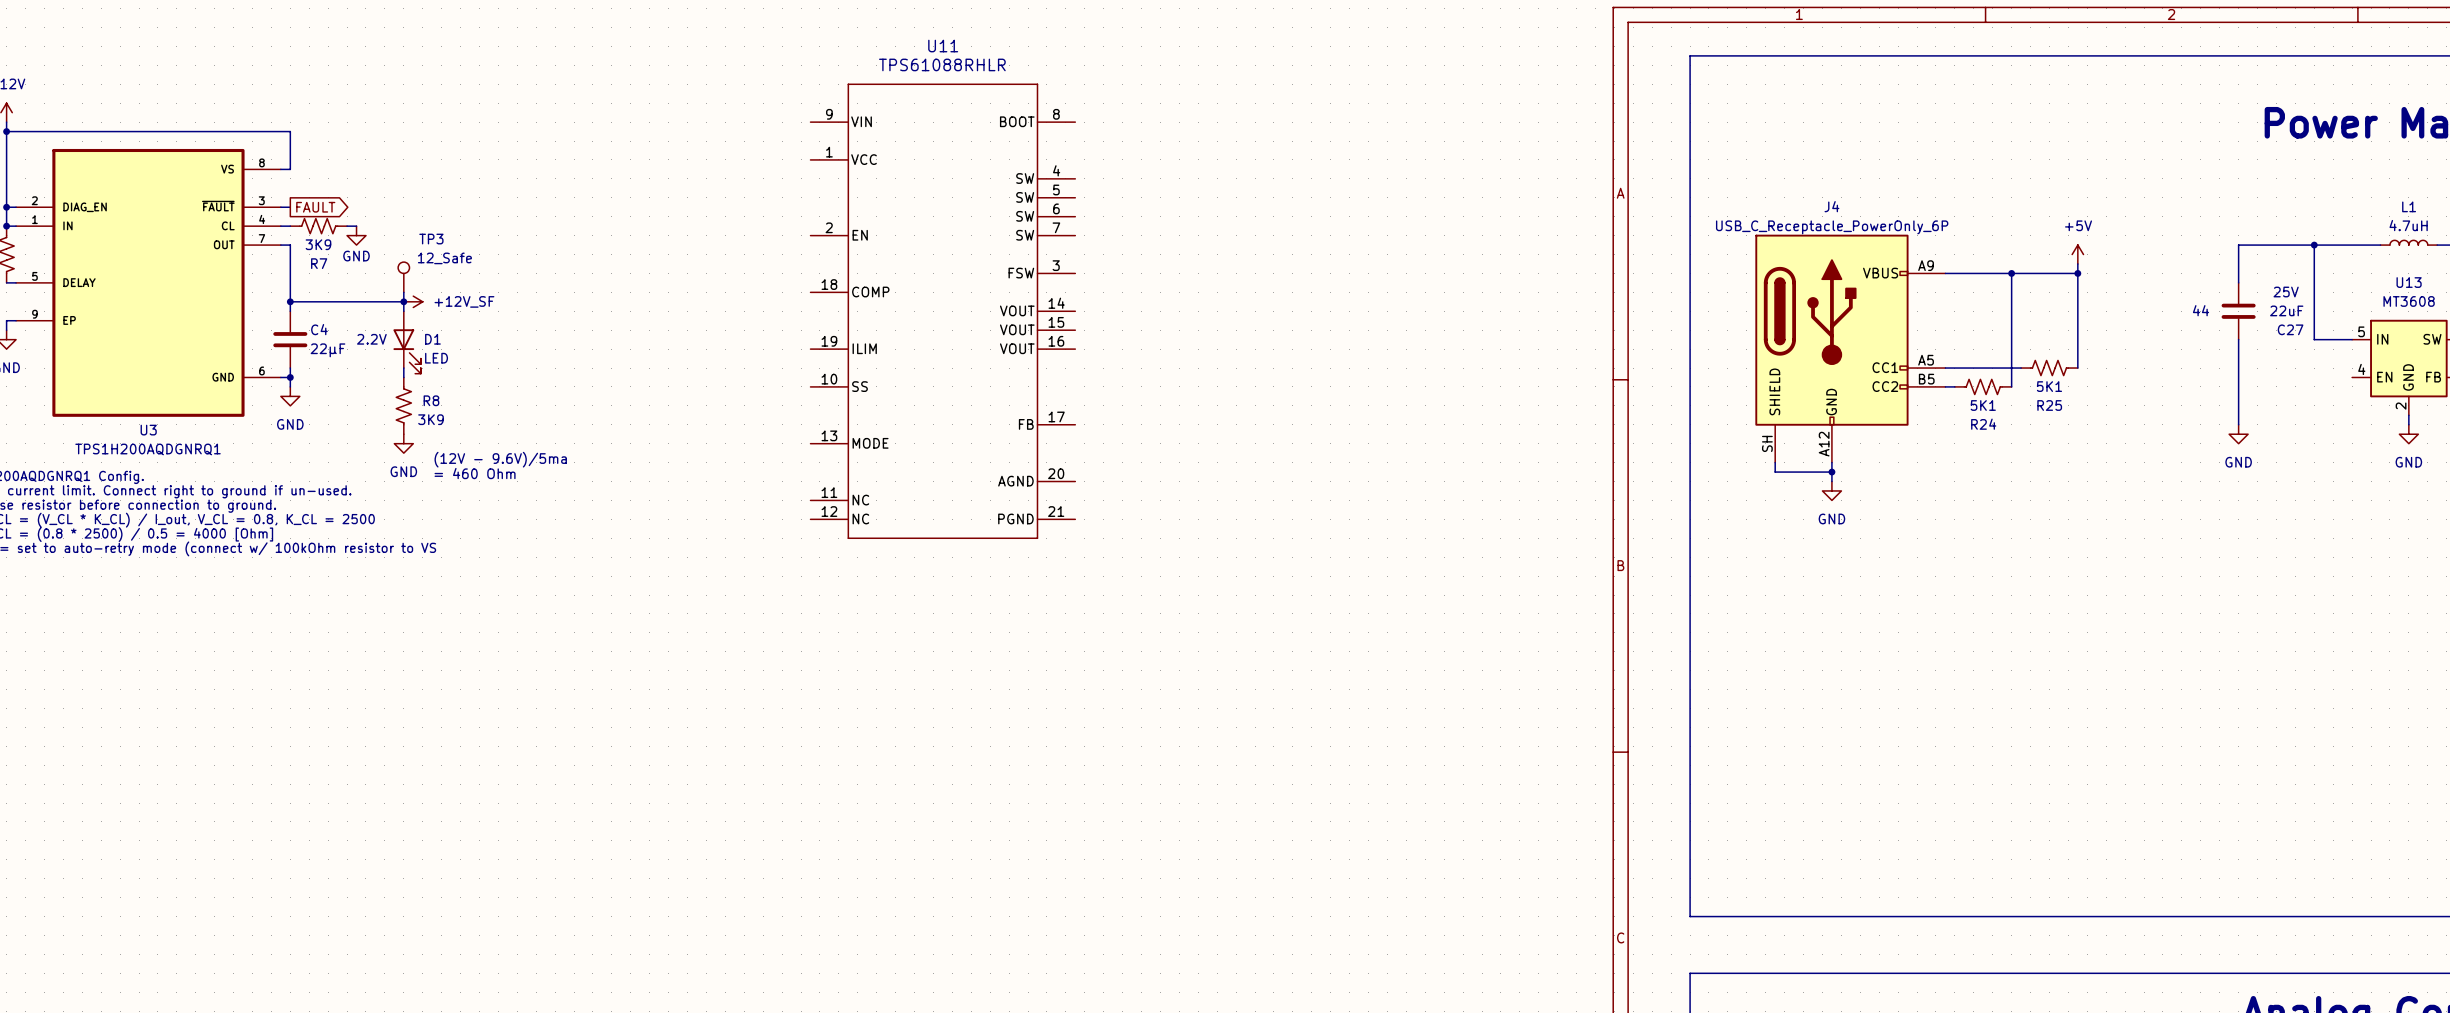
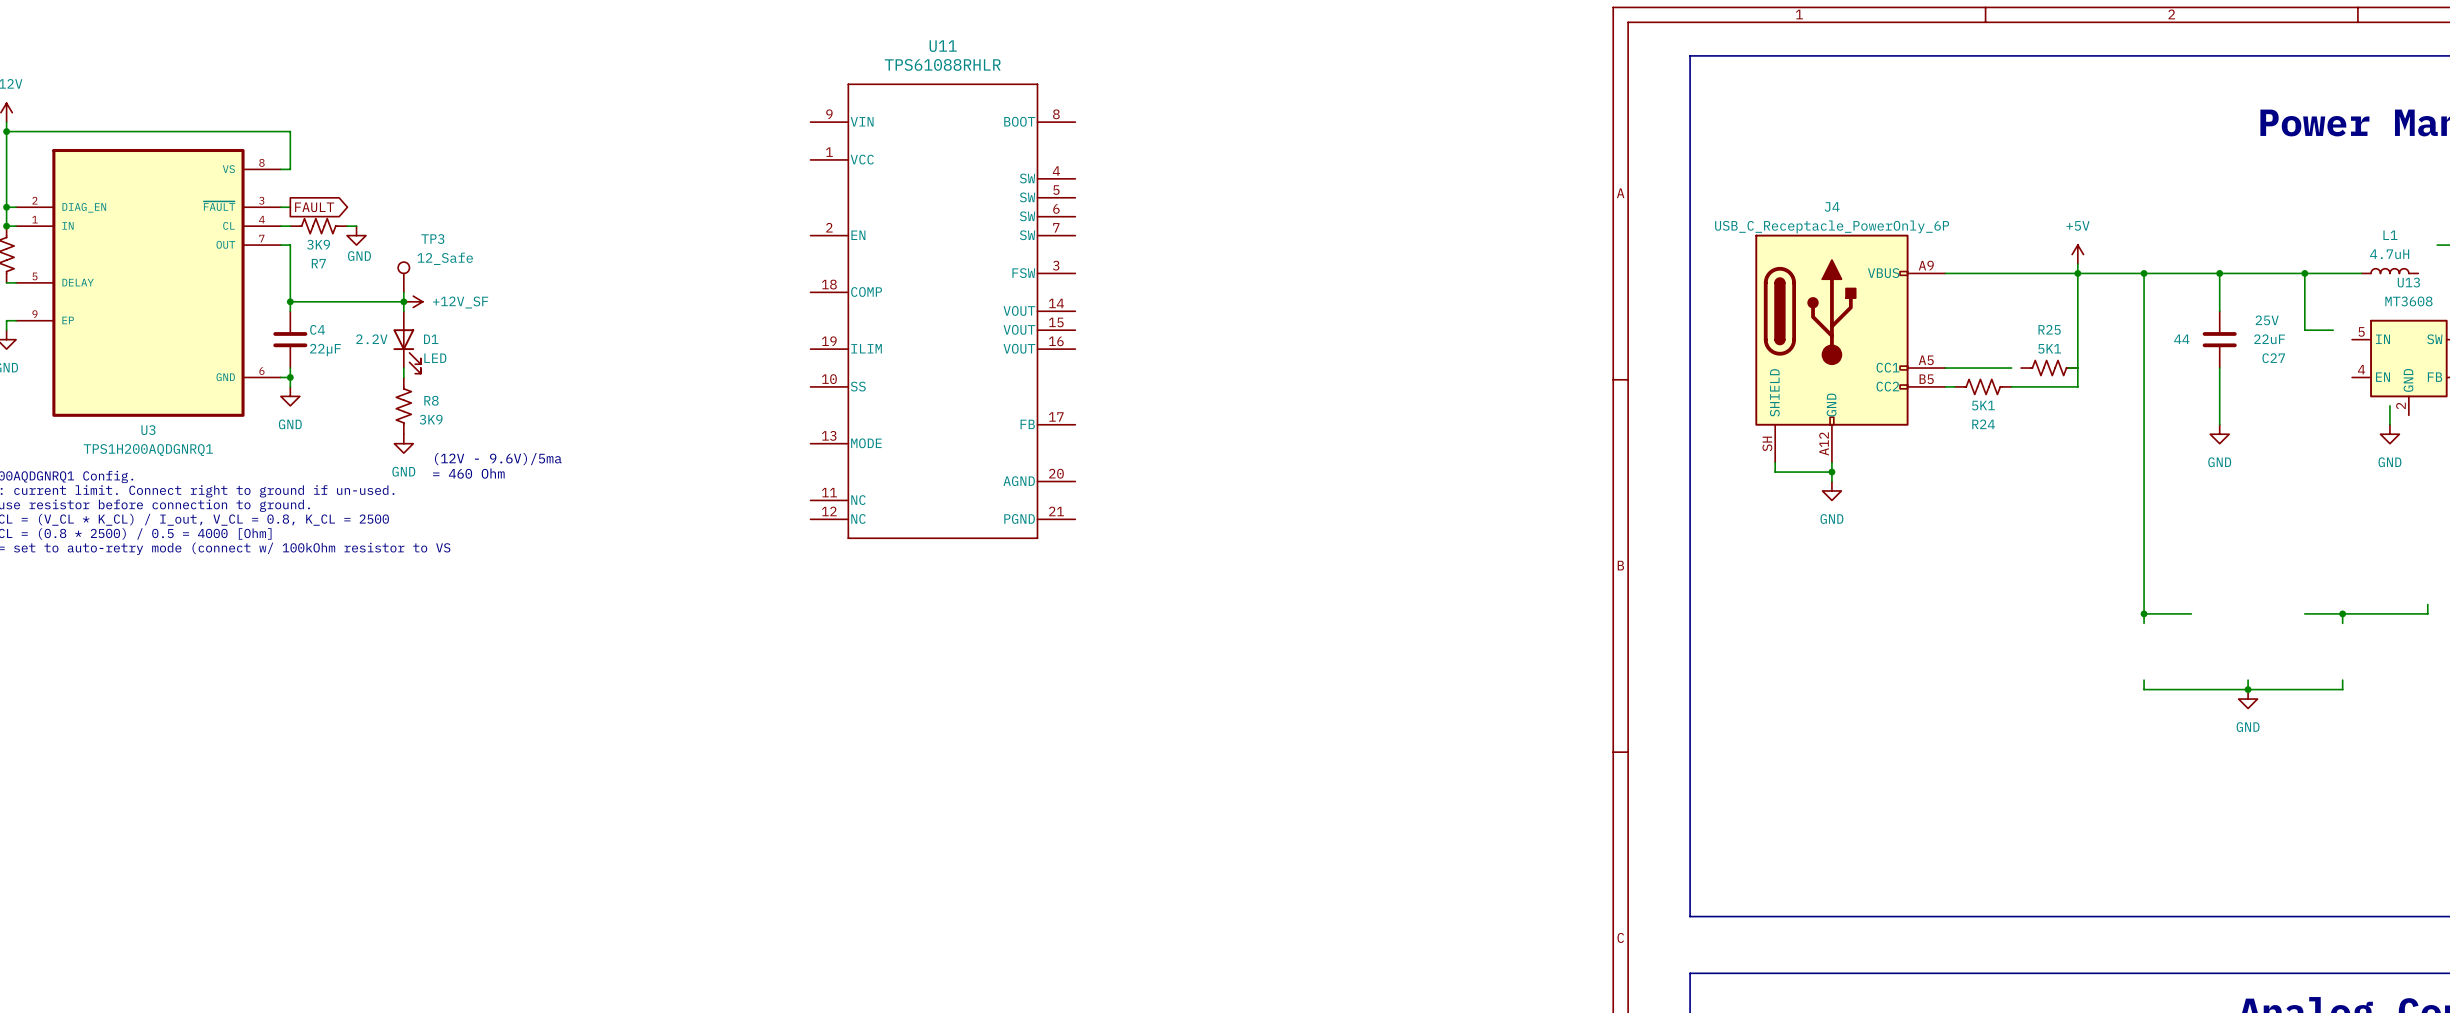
L1 position: (2408, 242) -> (2389, 271)
wire: (2314, 245) (2314, 339) (2352, 339) -> none
junction position: (2314, 245) -> (2304, 273)
wire: (2380, 245) (2238, 245) (2238, 282) -> none
wire: (2011, 273) (2011, 386) -> (2068, 368) (2077, 368) (2077, 386) (2011, 386)
junction: (2011, 273) -> none
wire: none -> (2077, 273) (2361, 273)
wire: none -> (2144, 273) (2144, 623)
junction: none -> (2144, 273)
wire: none -> (2219, 273) (2219, 311)
junction: none -> (2219, 273)
wire: none -> (2304, 273) (2304, 330) (2333, 330)
C27 position: (2238, 311) -> (2219, 339)
wire: (2238, 339) (2238, 424) -> none
wire: (2011, 368) (2021, 368) -> none
wire: none -> (2219, 368) (2219, 424)
R25 value position: 5K1 (2049, 386) -> 5K1 (2049, 348)
R25 name position: R25 (2049, 405) -> R25 (2049, 329)
wire: none -> (2389, 405) (2389, 424)
wire: (2408, 415) (2408, 424) -> none
power symbol position: GND (2238, 434) -> GND (2219, 434)
power symbol position: GND (2408, 434) -> GND (2389, 434)
wire: none -> (2427, 604) (2427, 613) (2304, 613)
wire: none -> (2144, 613) (2191, 613)
junction: none -> (2144, 613)
wire: none -> (2342, 613) (2342, 623)
junction: none -> (2342, 613)
wire: none -> (2144, 680) (2144, 689) (2342, 689) (2342, 680)
wire: none -> (2248, 680) (2248, 689)
junction: none -> (2248, 689)
power symbol: none -> GND (2248, 699)

